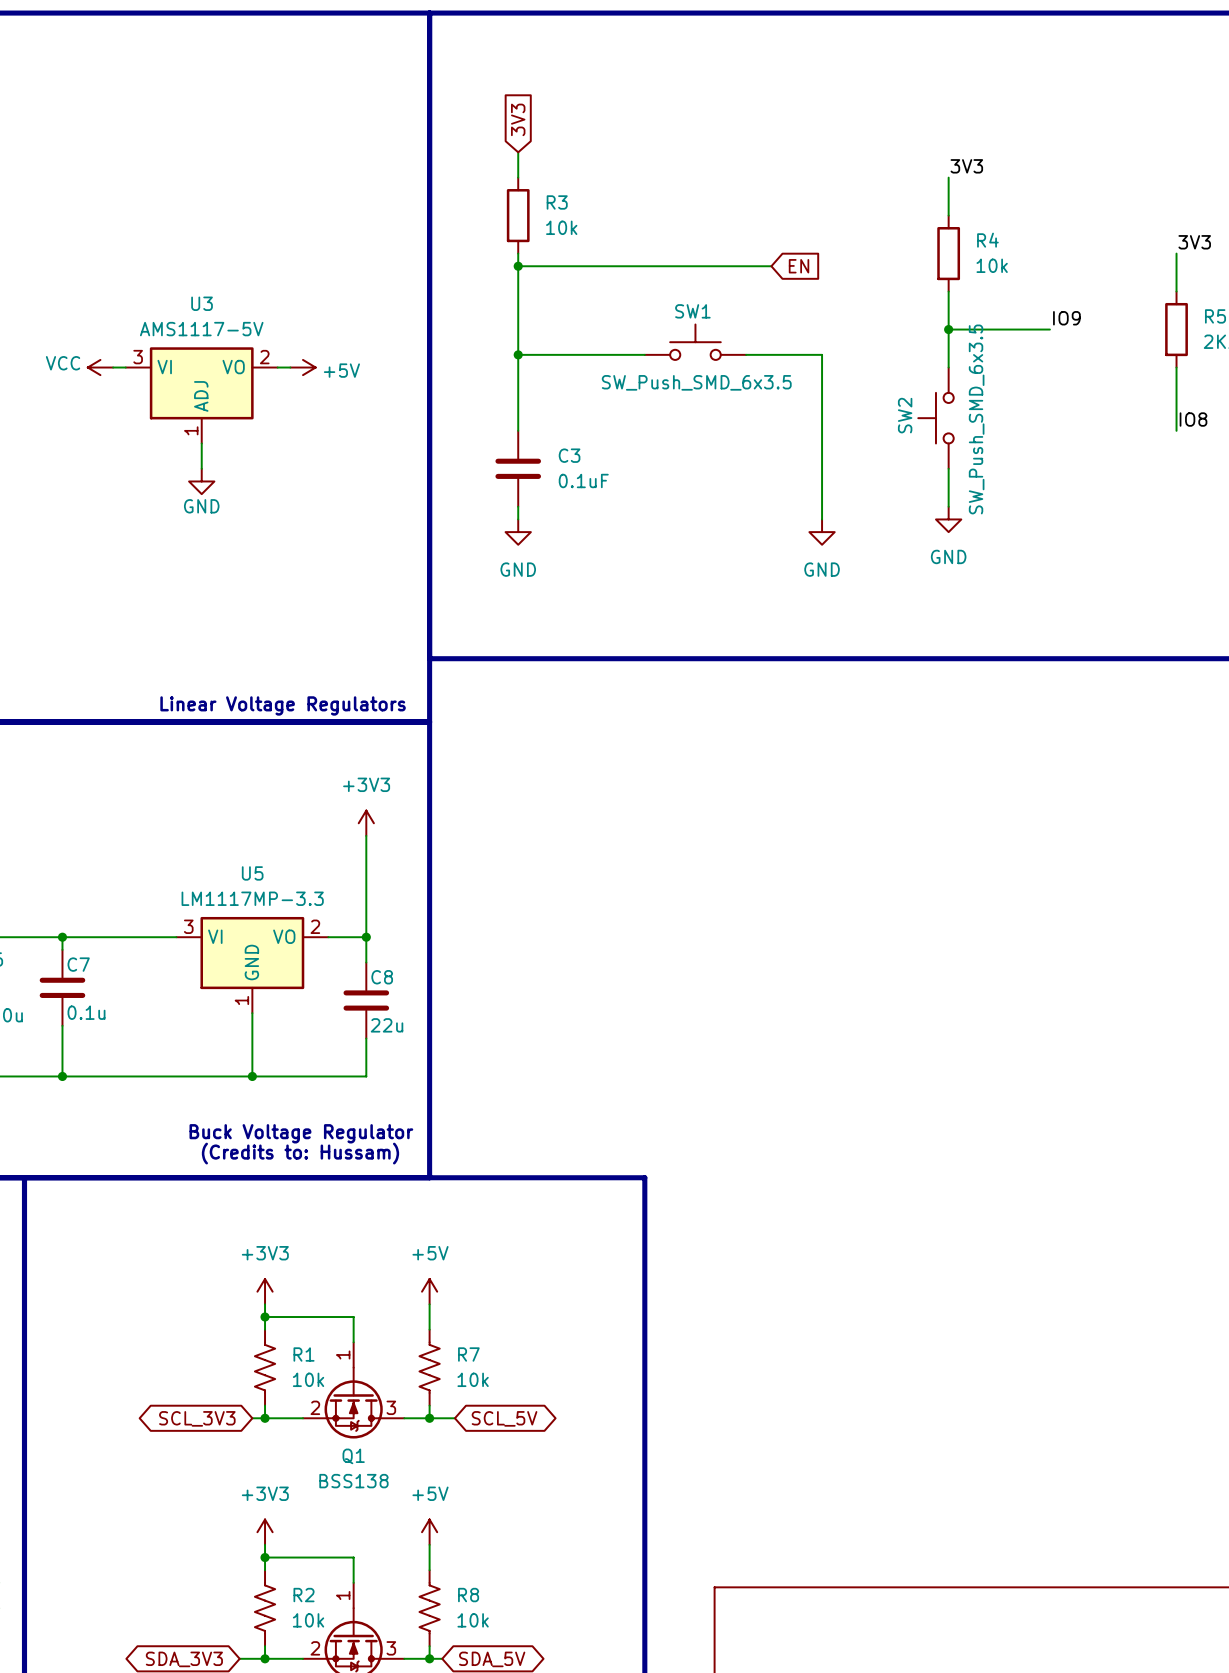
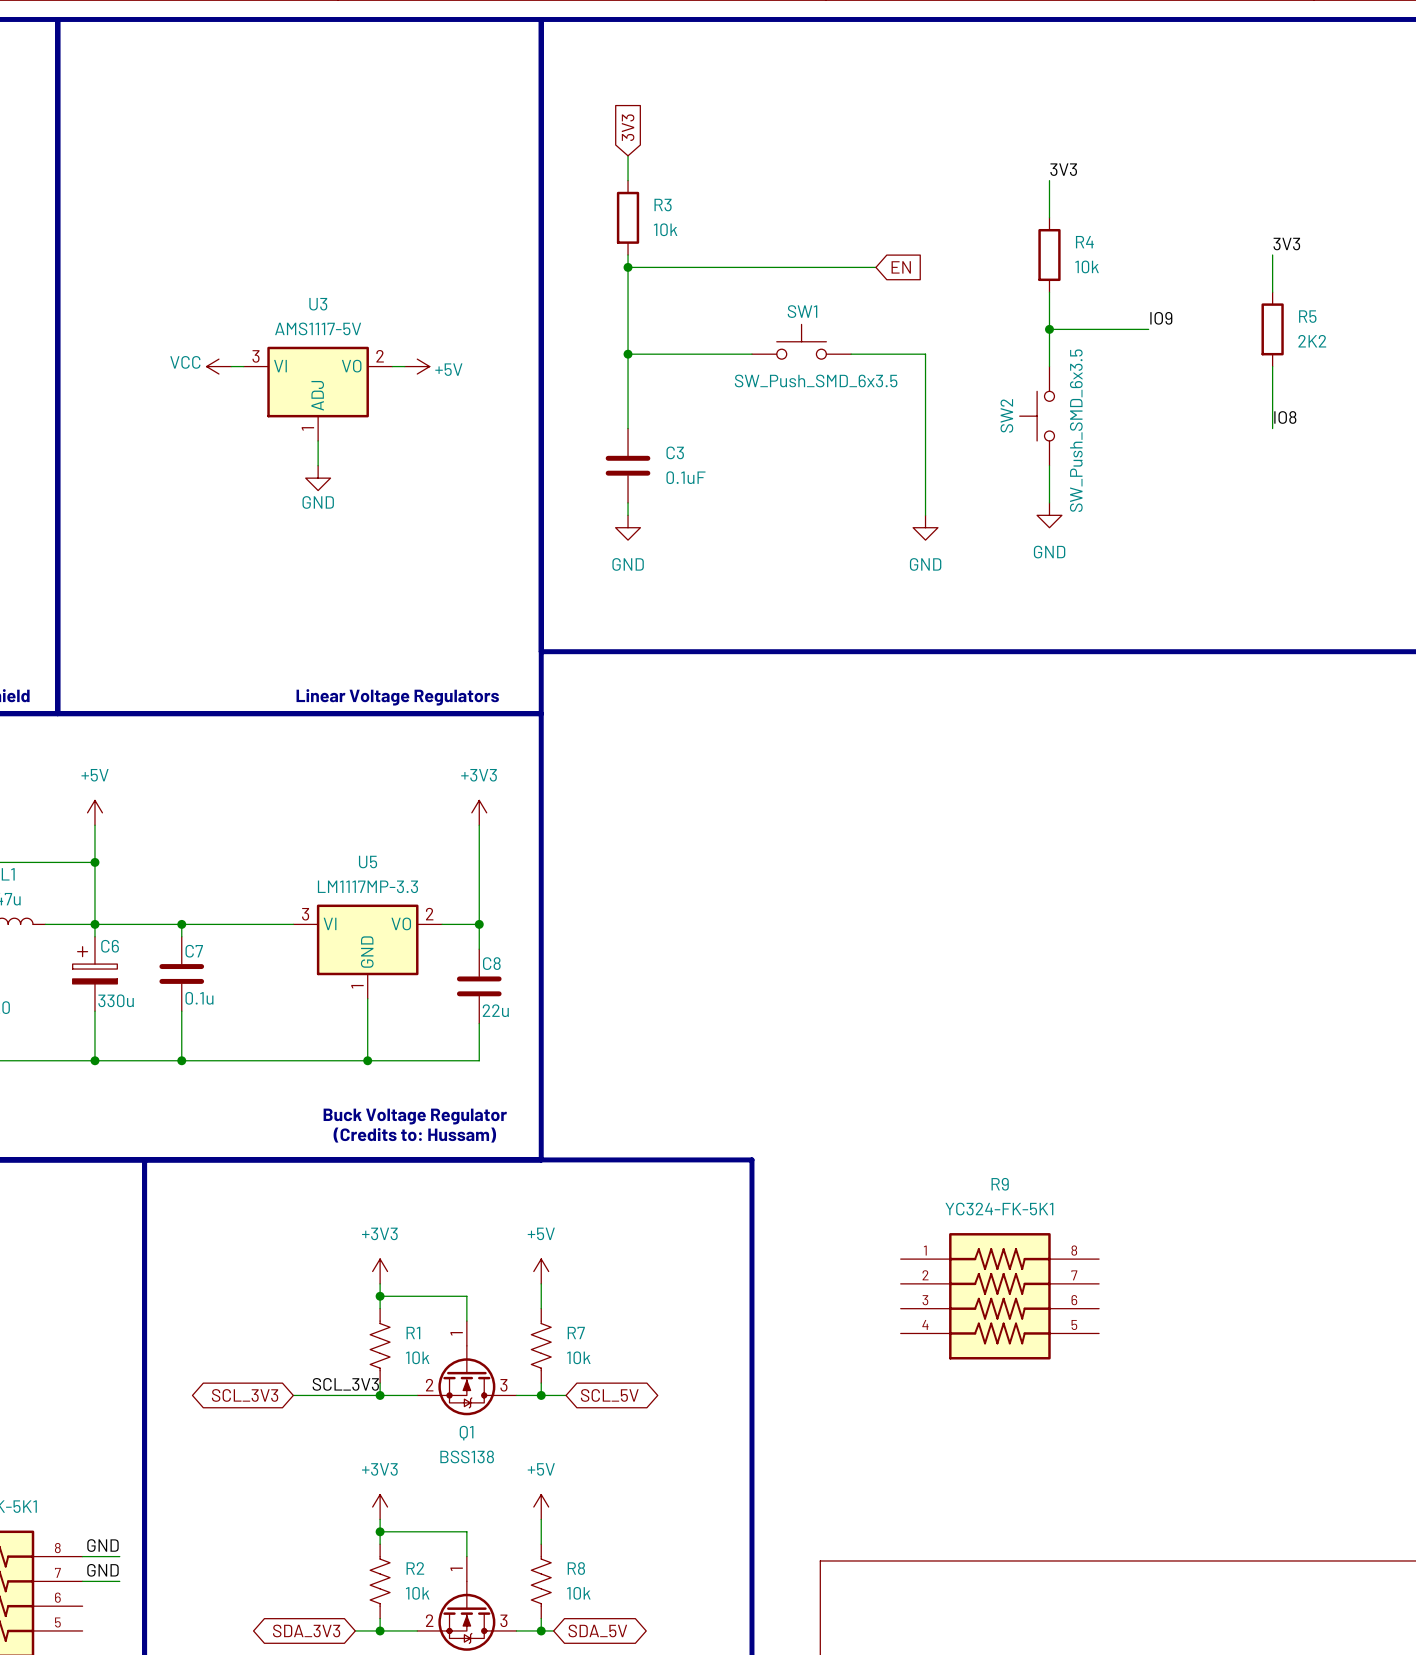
R9: none -> YC324-FK-5K1 (999, 1296)
label: none -> SCL_3V3 (345, 1384)
wire: none -> (293, 1395) (367, 1395)
global label position: SCL_3V3 (197, 1418) -> SCL_3V3 (245, 1395)

